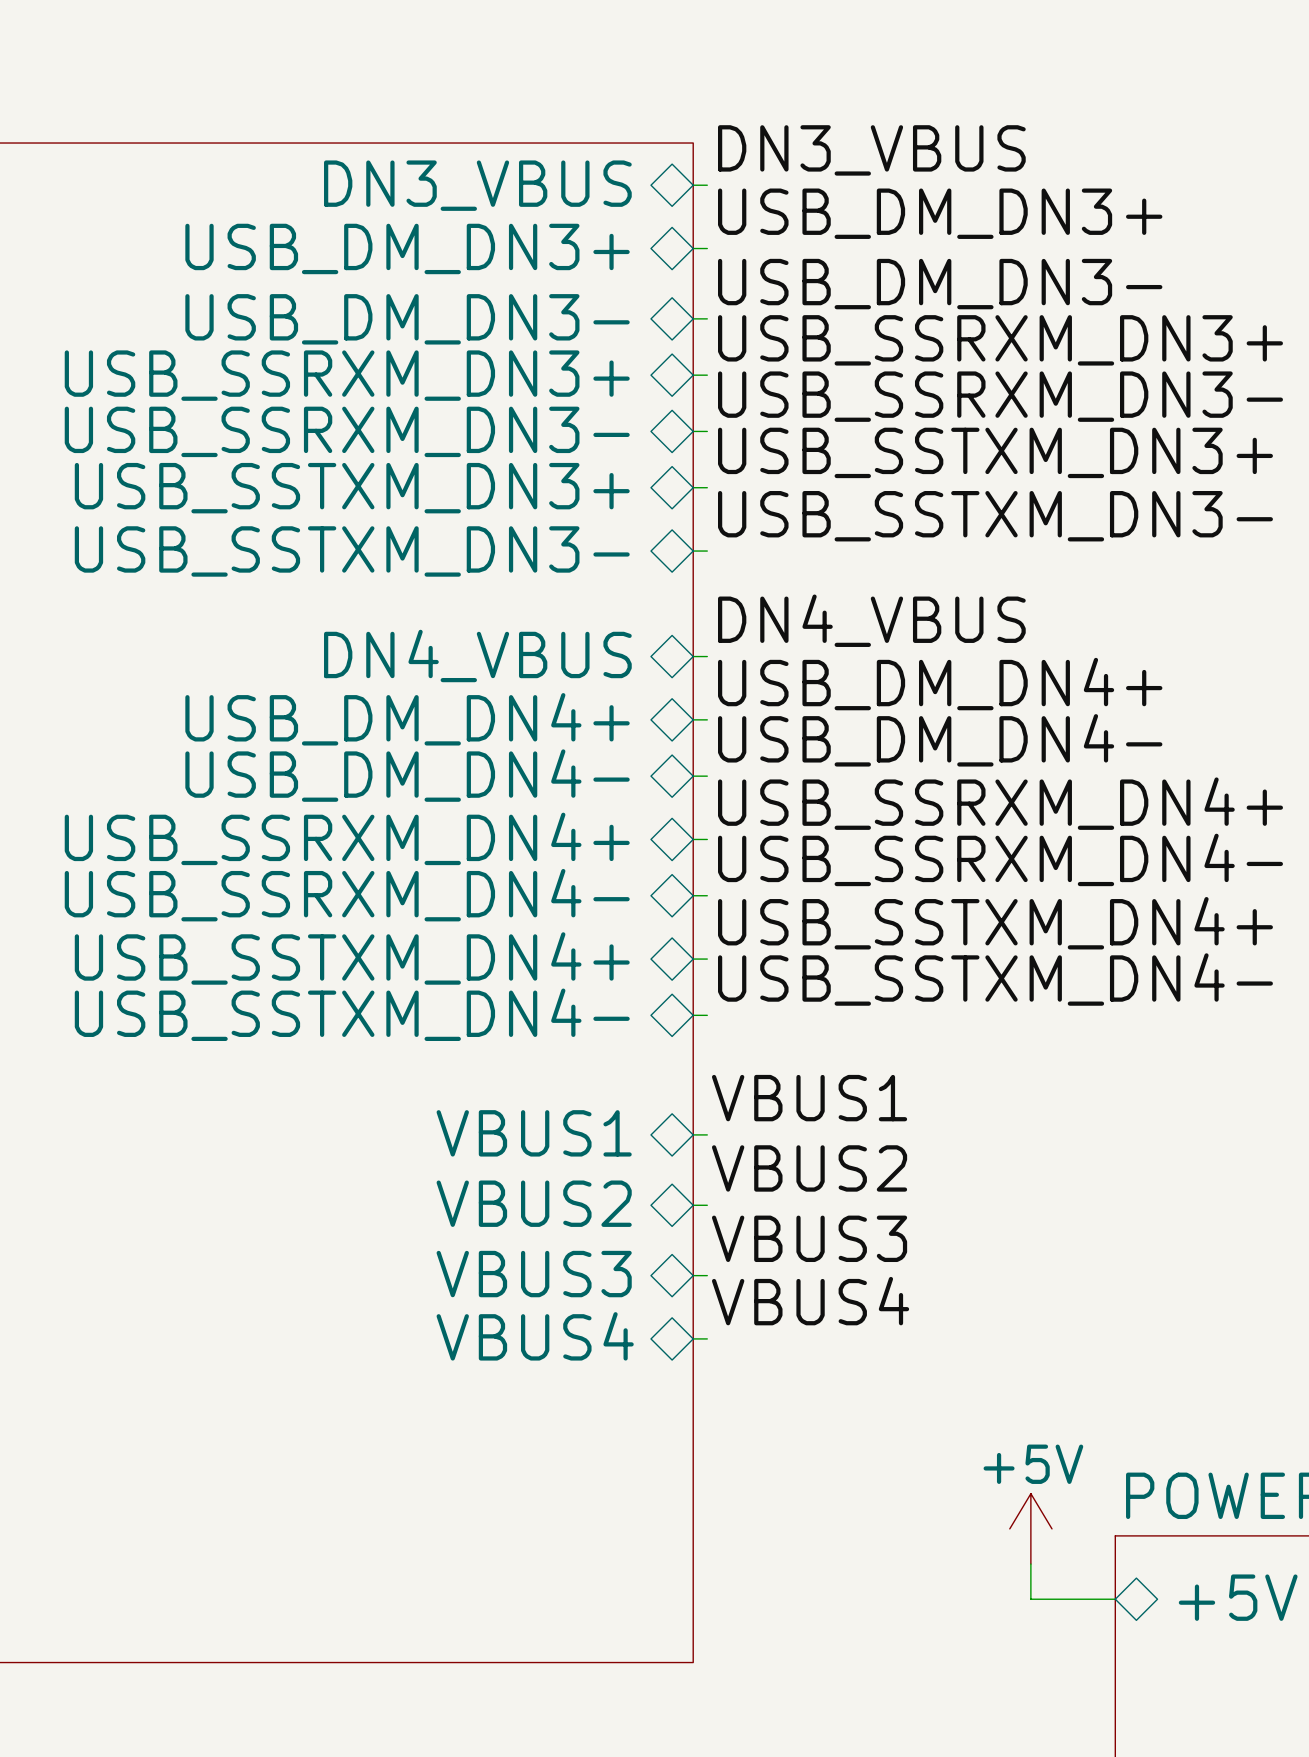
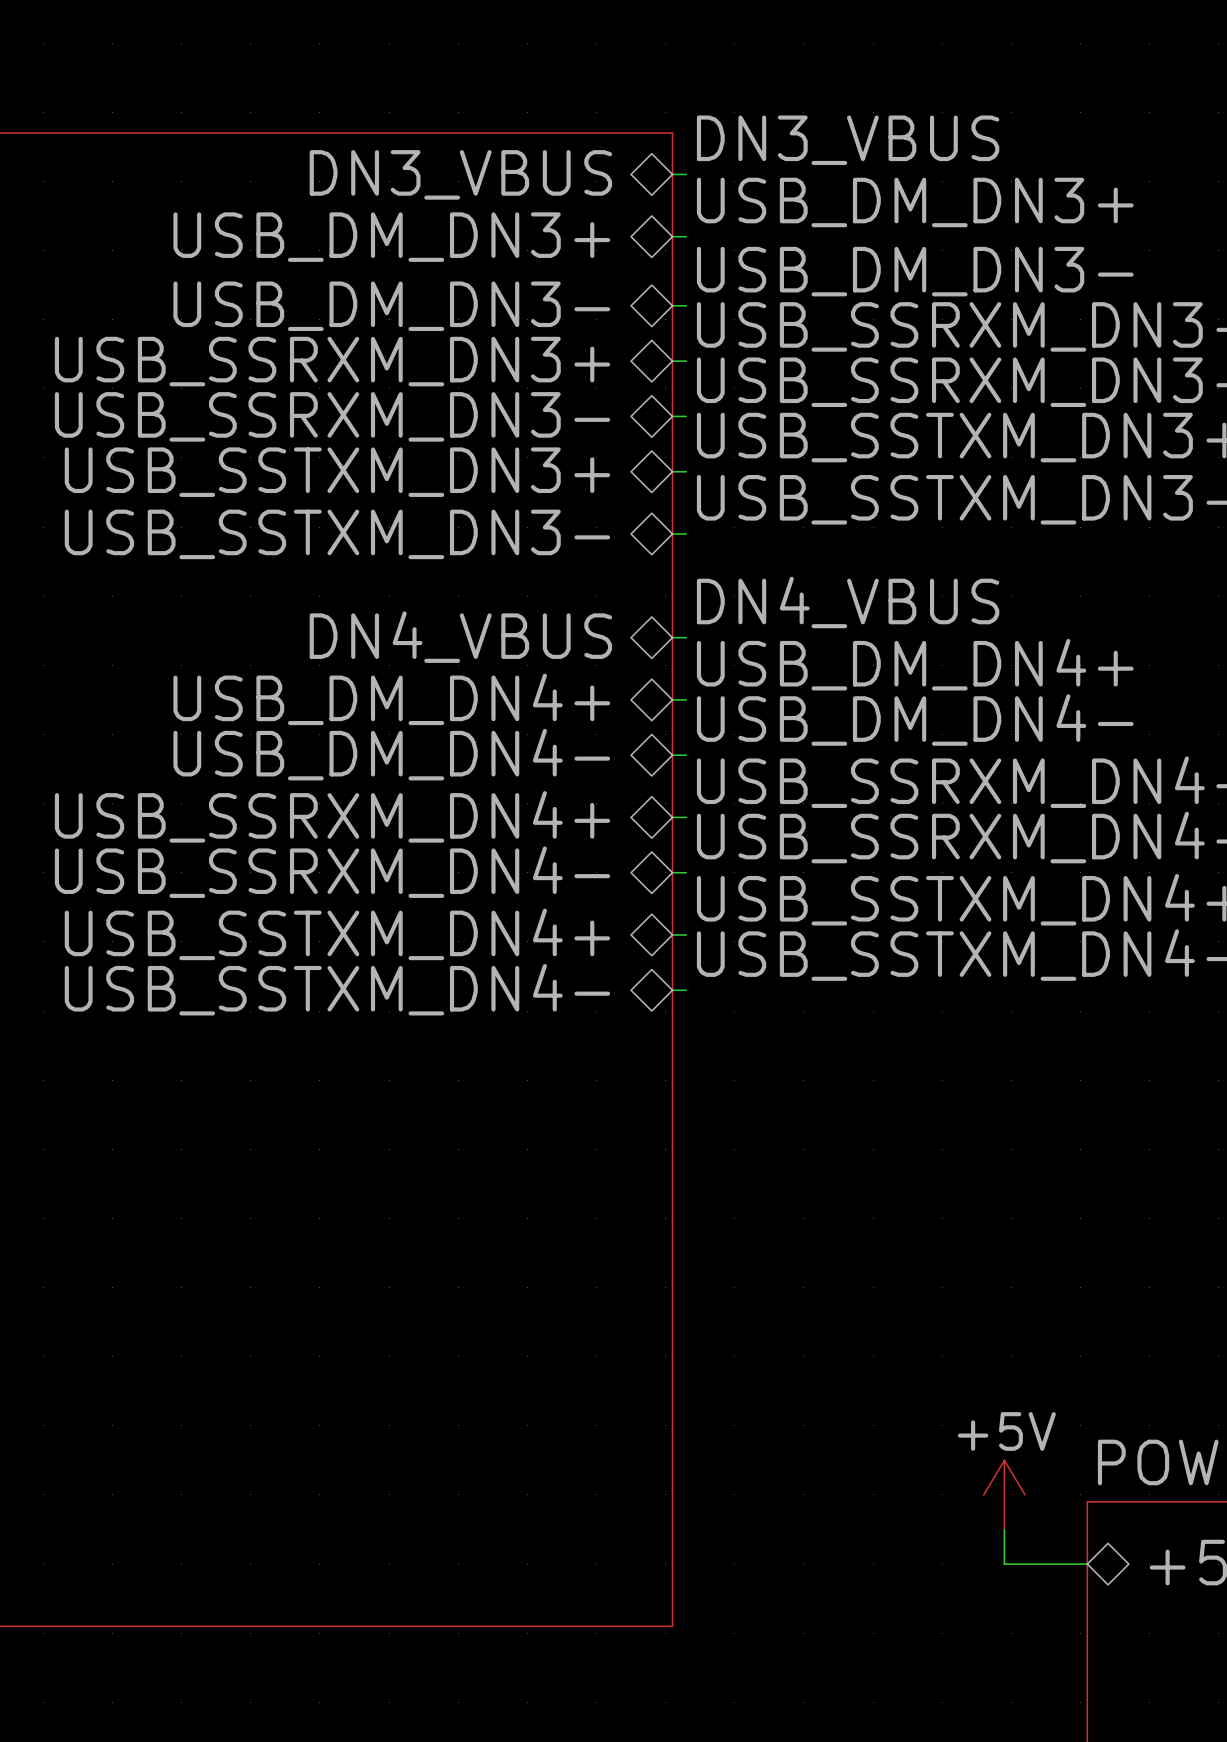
label: VBUS1 (809, 1098) -> none
sheet pin: VBUS1 (534, 1133) -> none
wire: (693, 1134) (707, 1134) -> none
label: VBUS2 (809, 1168) -> none
sheet pin: VBUS2 (534, 1203) -> none
wire: (693, 1205) (707, 1205) -> none
label: VBUS3 (809, 1238) -> none
sheet pin: VBUS3 (534, 1274) -> none
wire: (693, 1275) (707, 1275) -> none
label: VBUS4 (810, 1301) -> none
sheet pin: VBUS4 (535, 1336) -> none
wire: (693, 1338) (707, 1338) -> none

